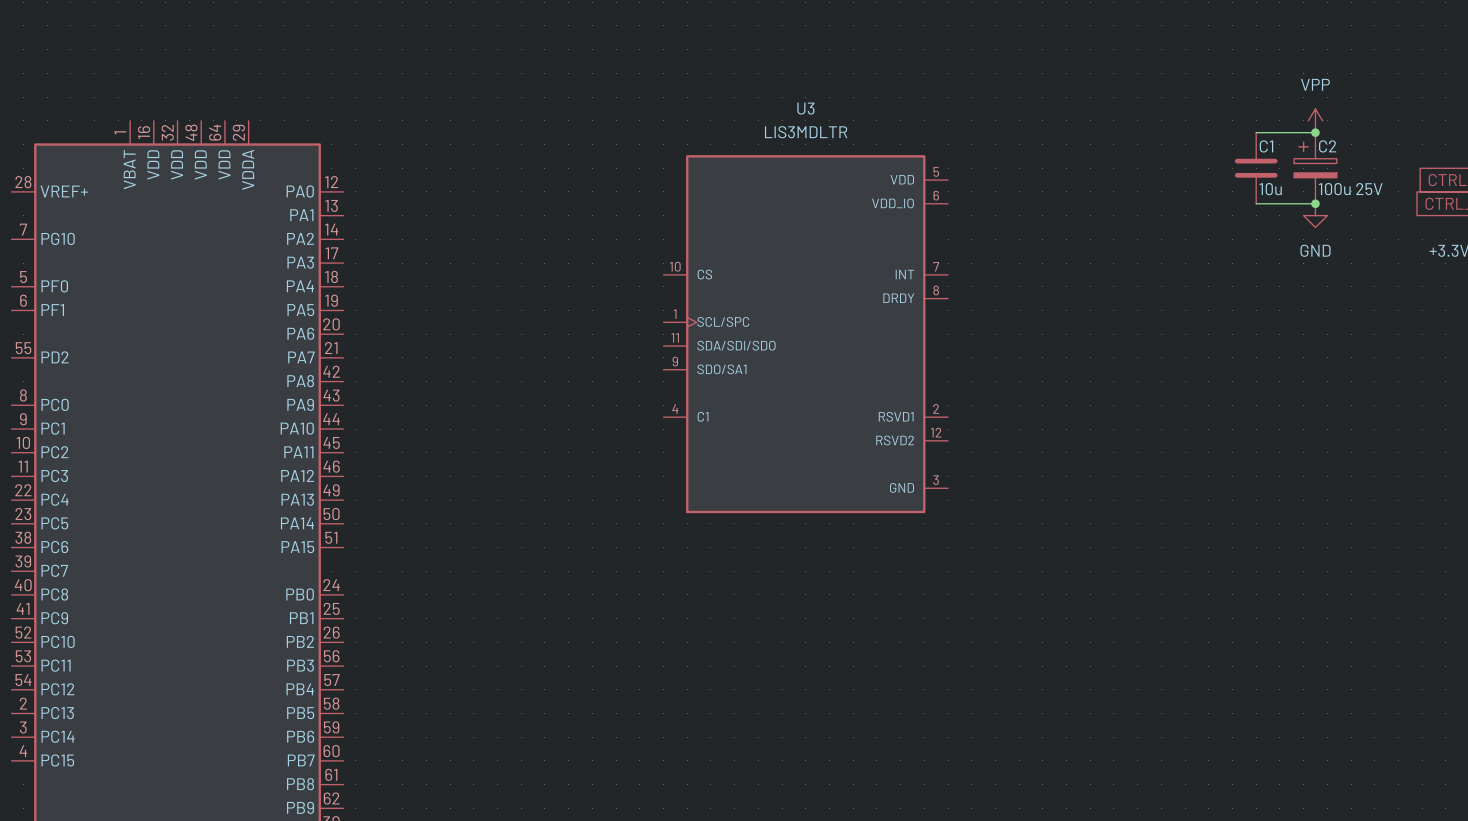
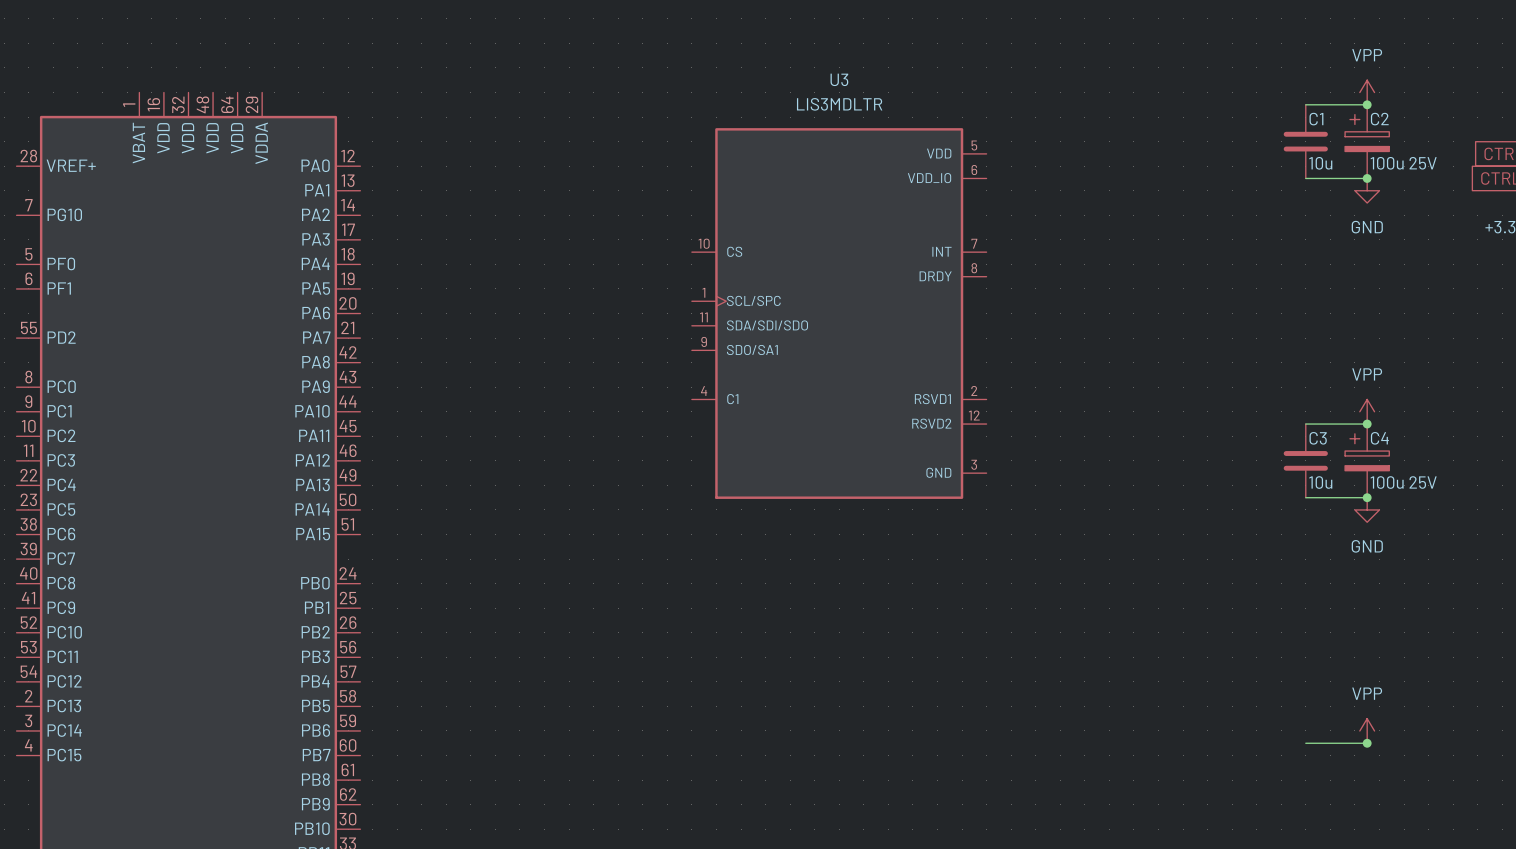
power symbol: none -> VPP (1367, 411)
wire: none -> (1305, 424) (1367, 424)
junction: none -> (1367, 424)
C3: none -> 10u (1305, 460)
C4: none -> 100u 25V (1367, 460)
wire: none -> (1305, 497) (1367, 497)
junction: none -> (1367, 497)
power symbol: none -> GND (1367, 509)
power symbol: none -> VPP (1367, 730)
wire: none -> (1305, 743) (1367, 743)
junction: none -> (1367, 743)

